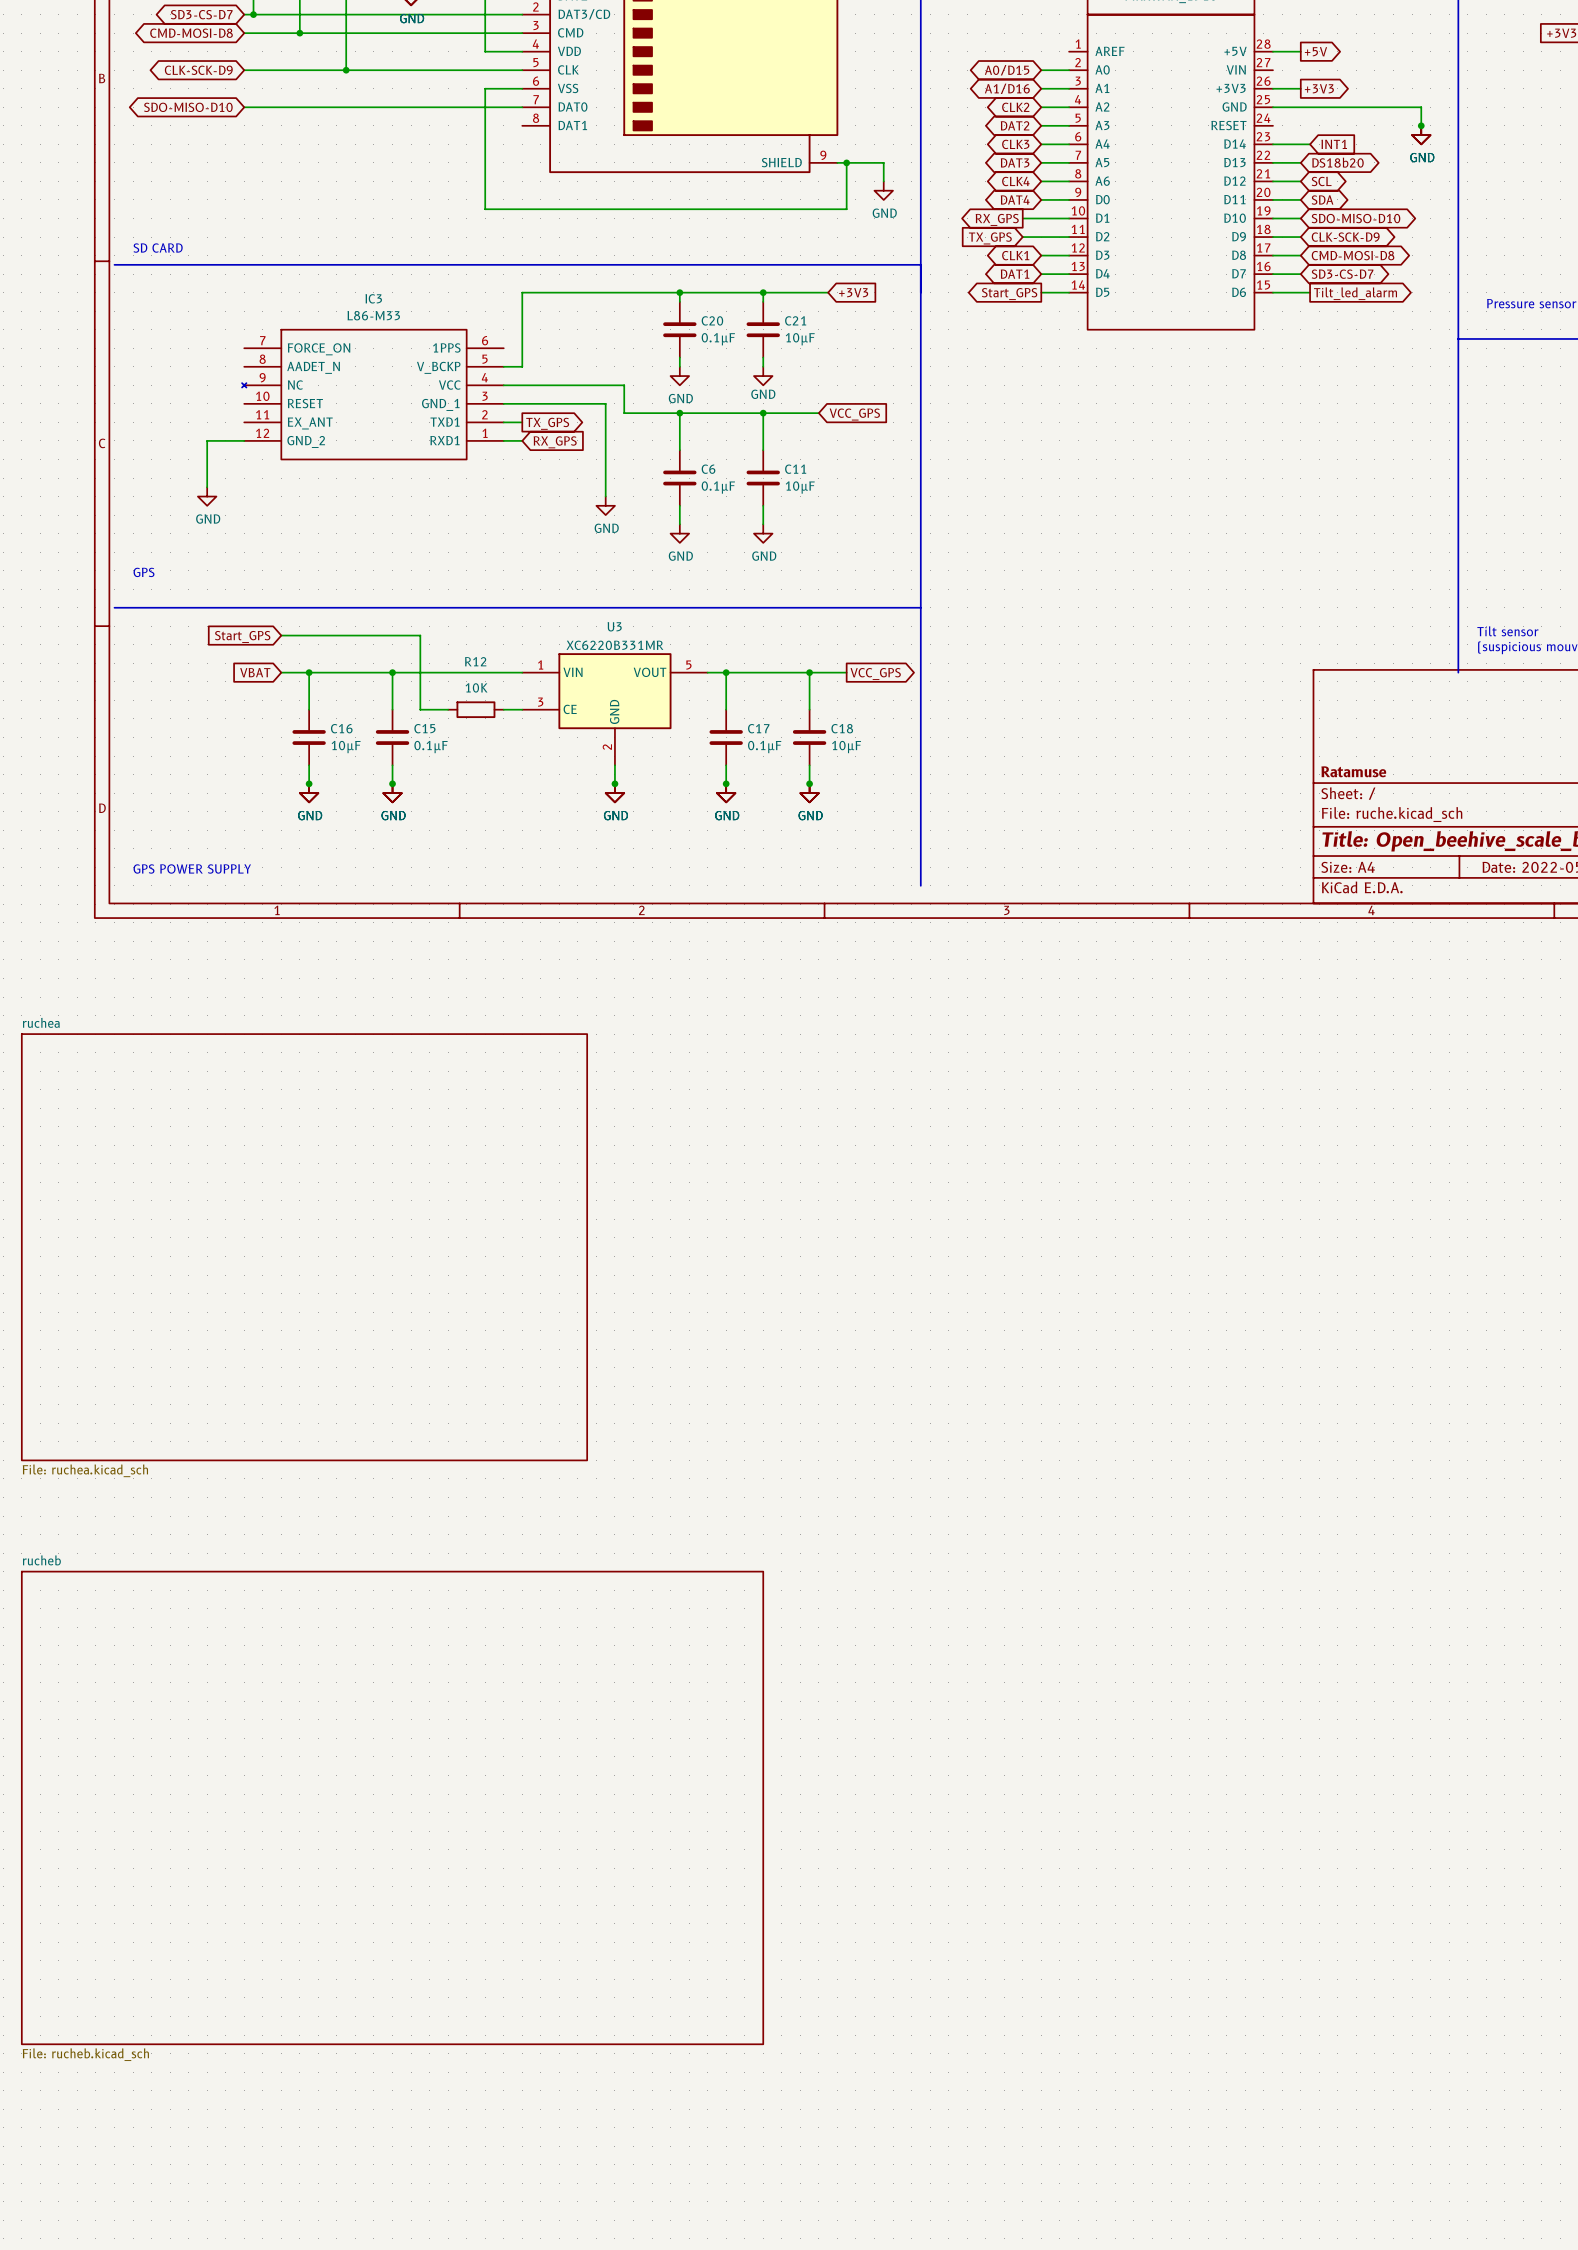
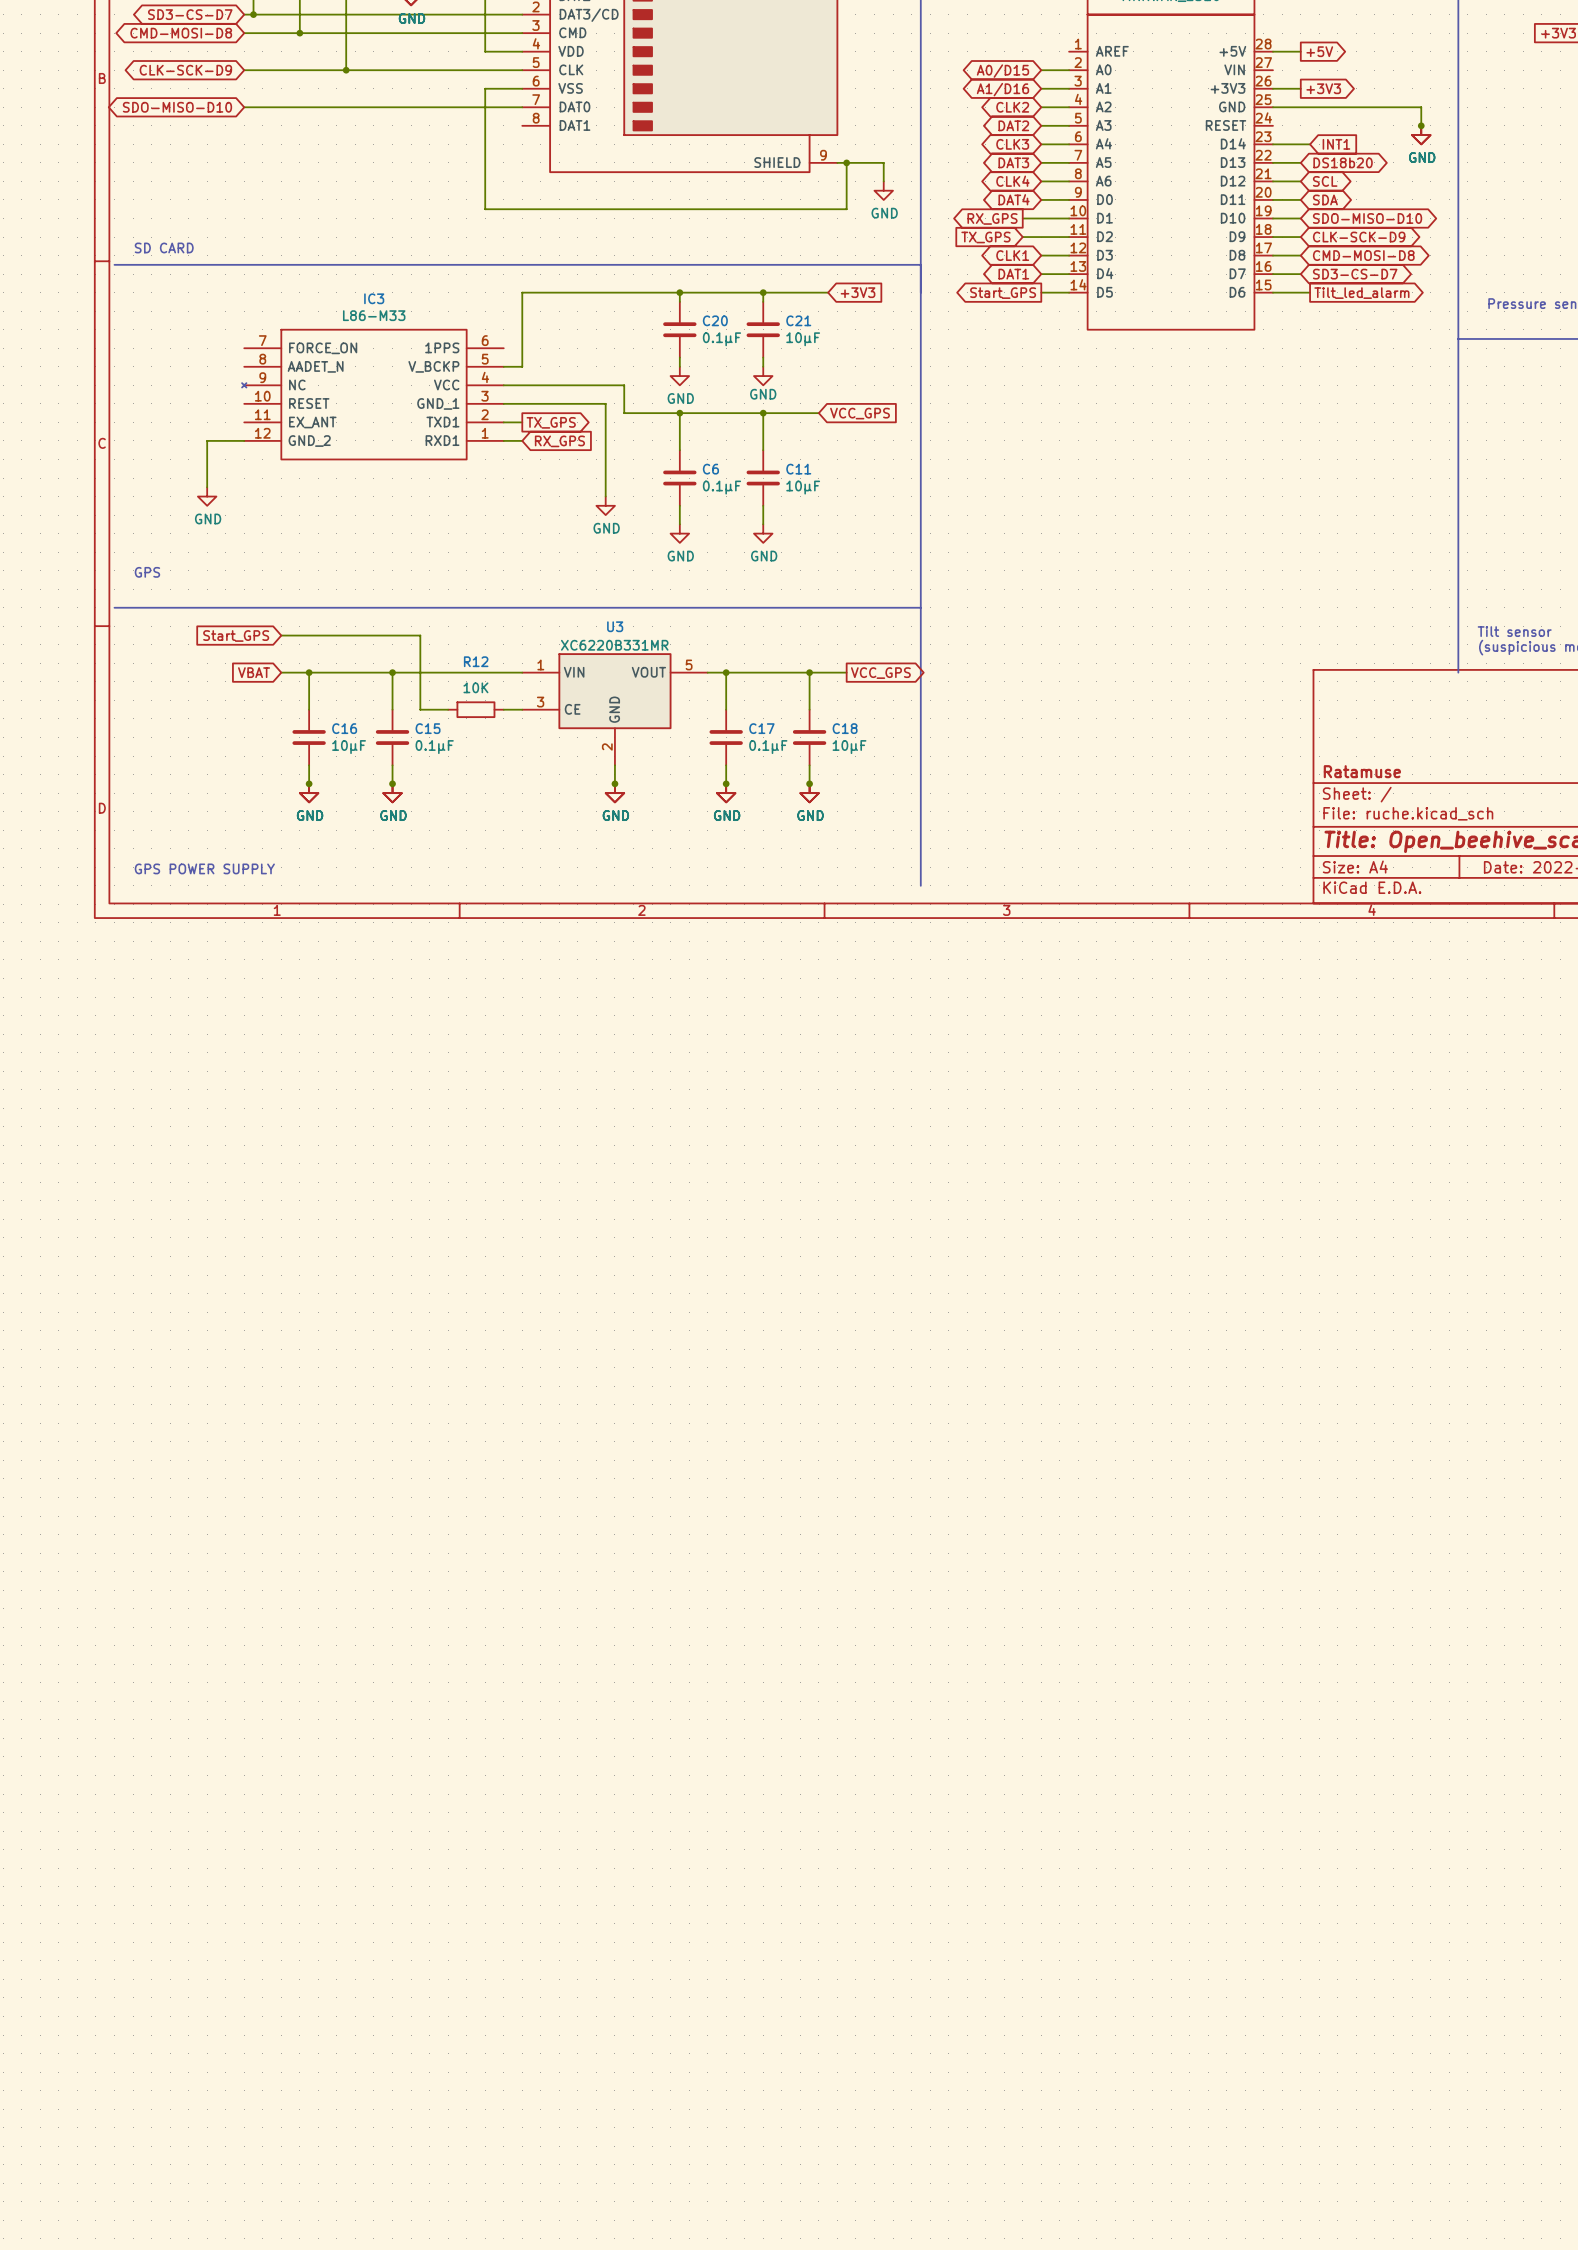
sheet ruchea: File: ruchea.kicad_sch (304, 1247) -> none
sheet rucheb: File: rucheb.kicad_sch (392, 1807) -> none

